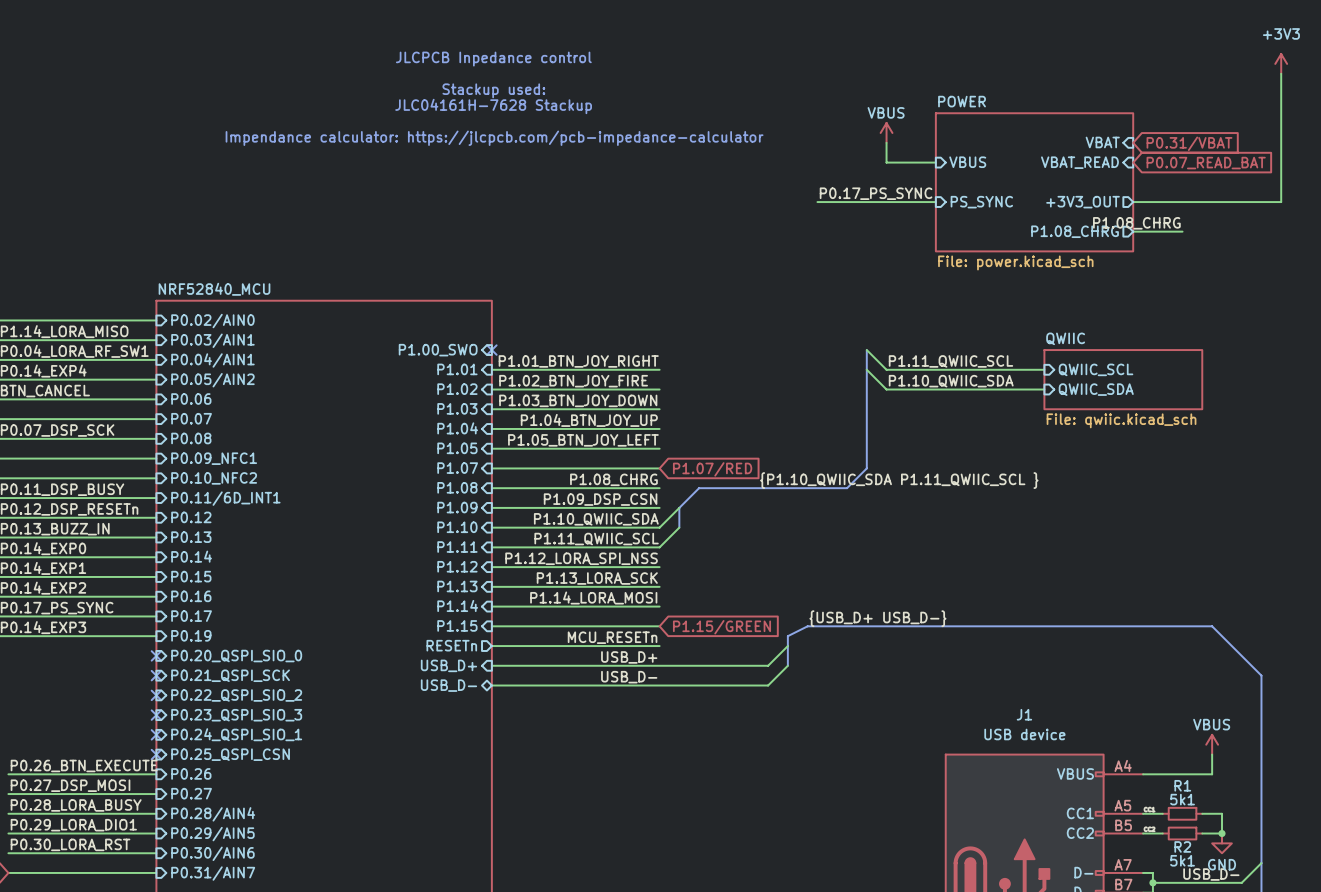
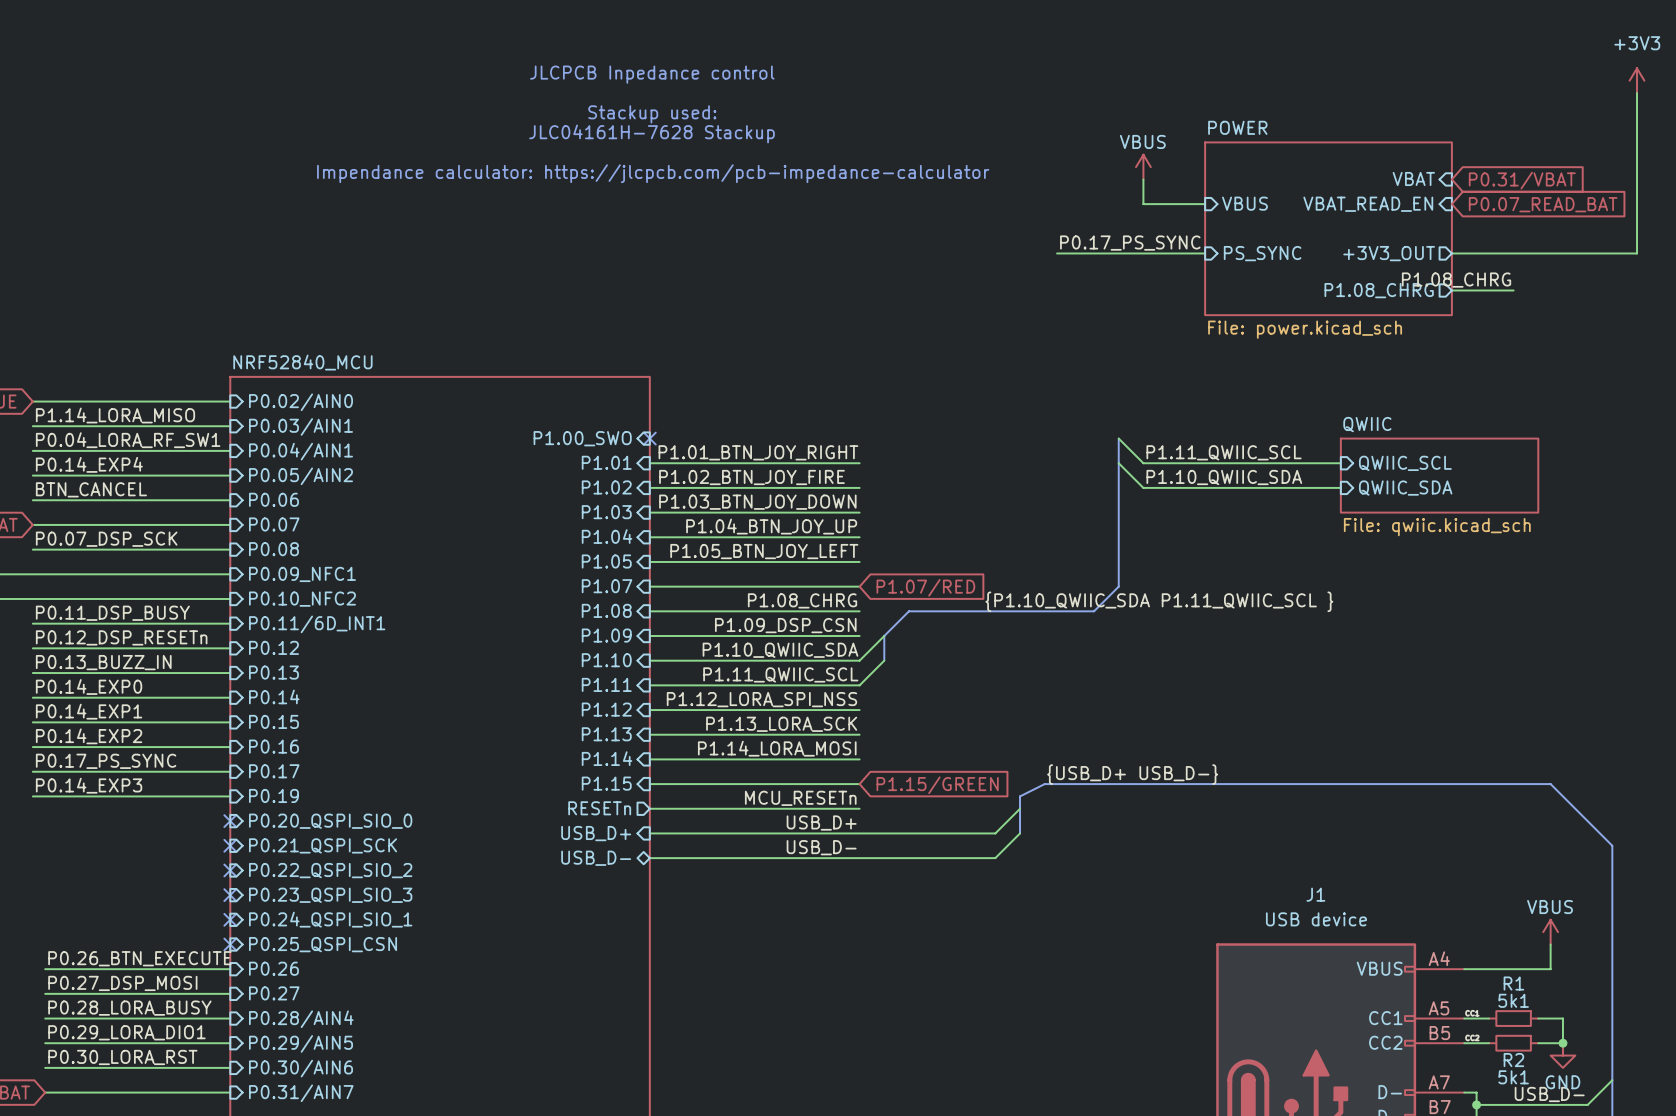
sheet pin: VBAT_READ (1079, 162) -> VBAT_READ_EN (1368, 204)

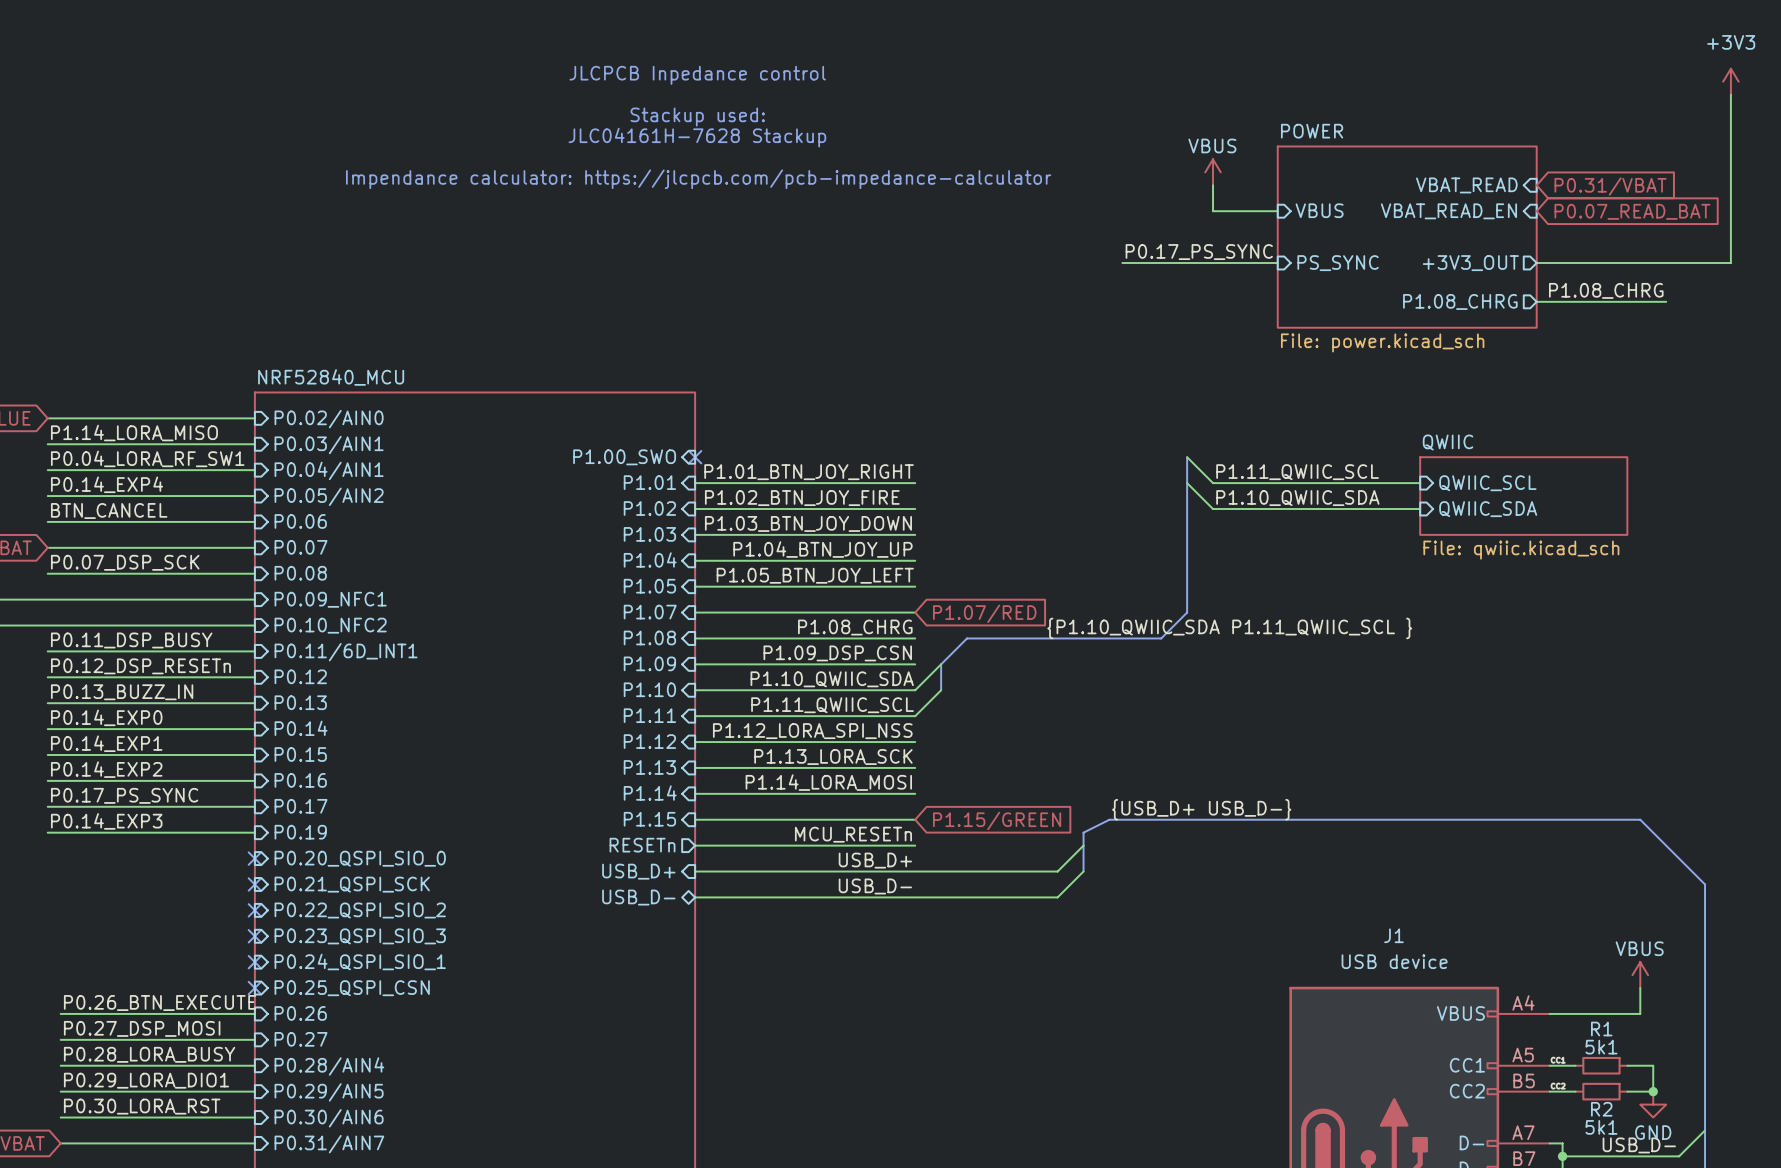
sheet pin: VBAT (1413, 178) -> VBAT_READ (1466, 185)
label position: P1.08_CHRG (1456, 280) -> P1.08_CHRG (1606, 290)
wire: none -> (1601, 301) (1666, 301)

